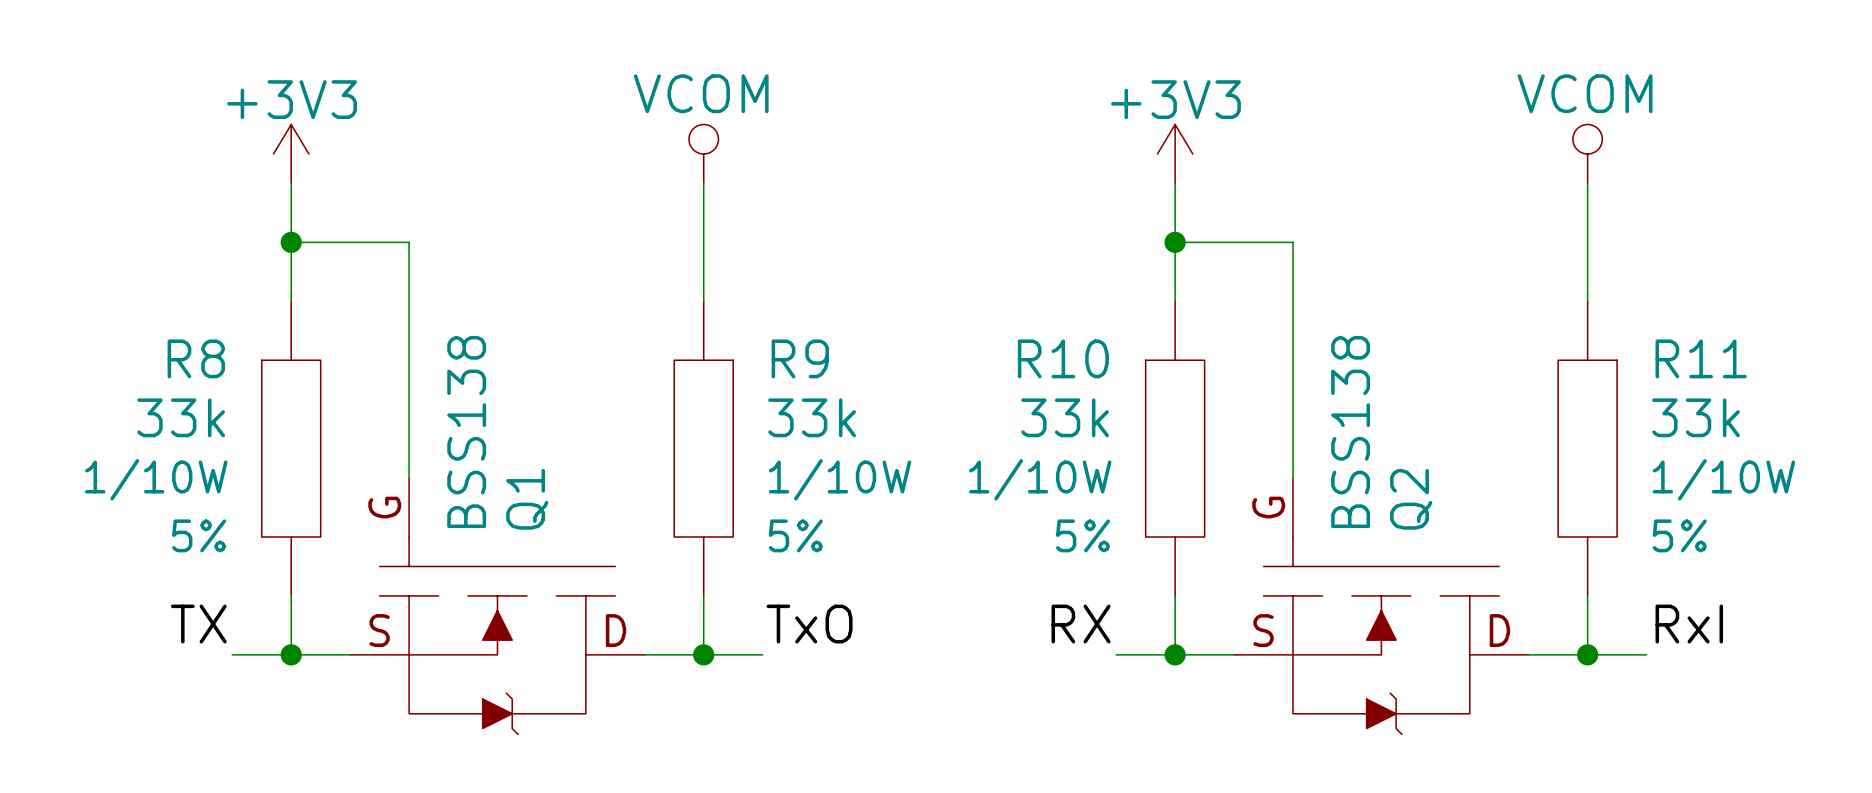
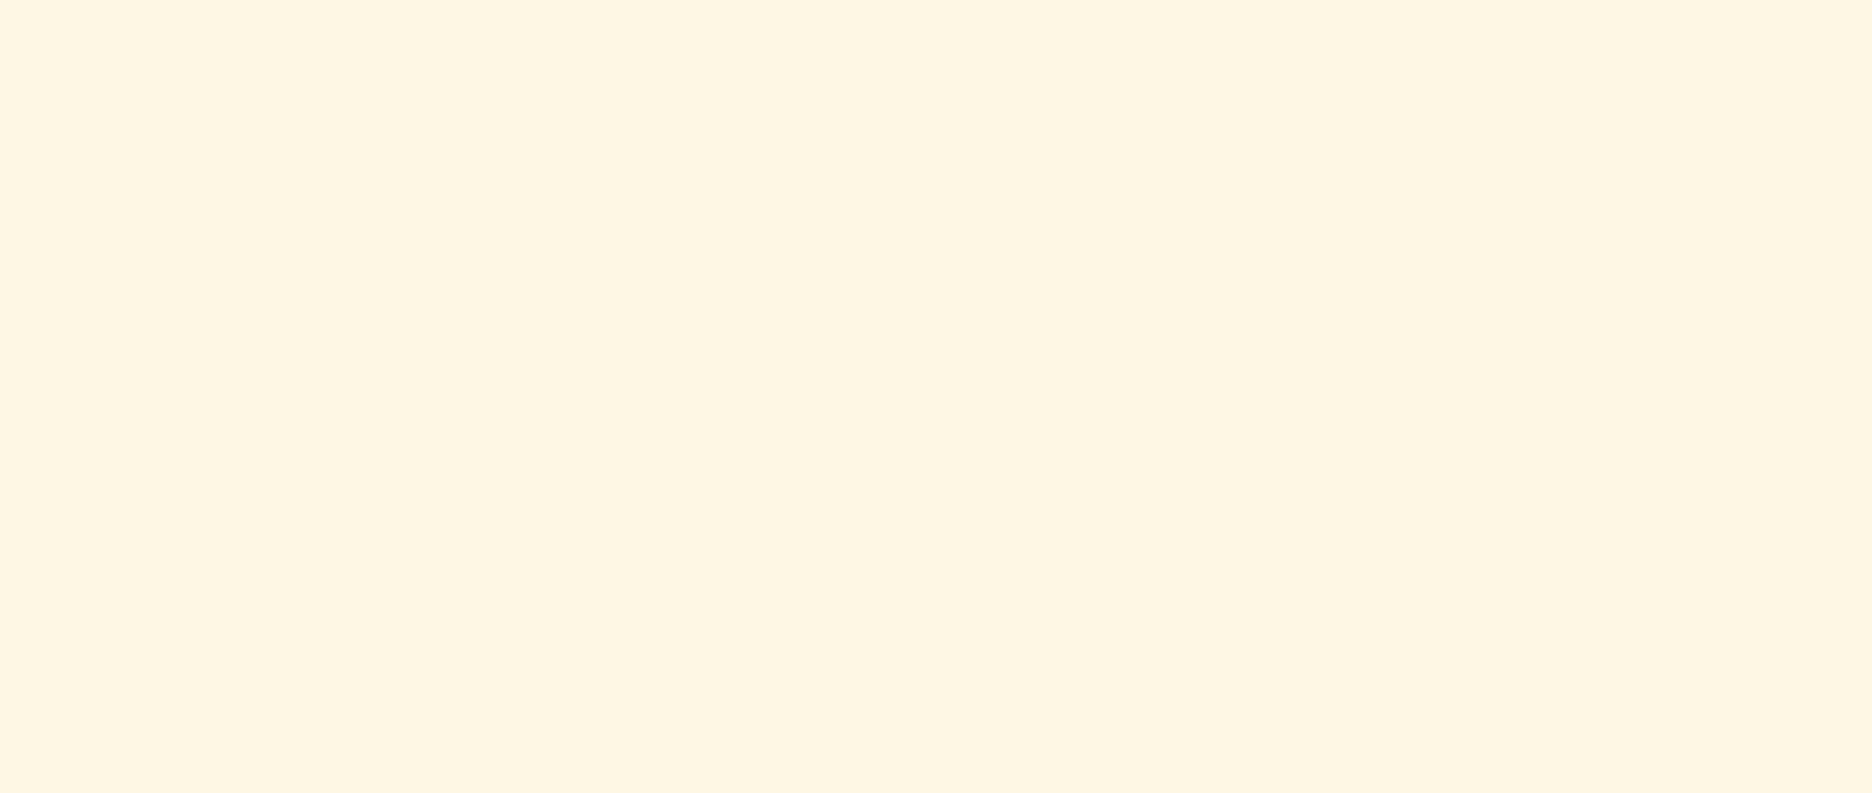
power symbol: +3V3 (291, 153) -> none
power symbol: VCOM (703, 153) -> none
power symbol: +3V3 (1175, 153) -> none
power symbol: VCOM (1587, 153) -> none
wire: (291, 183) (291, 301) -> none
wire: (703, 183) (703, 301) -> none
wire: (1175, 183) (1175, 301) -> none
wire: (1587, 183) (1587, 301) -> none
wire: (291, 242) (409, 242) (409, 478) -> none
junction: (291, 242) -> none
wire: (1175, 242) (1292, 242) (1292, 478) -> none
junction: (1175, 242) -> none
R8: 33k (291, 448) -> none
R9: 33k (703, 448) -> none
R10: 33k (1175, 448) -> none
R11: 33k (1587, 448) -> none
wire: (291, 595) (291, 654) -> none
wire: (703, 595) (703, 654) -> none
wire: (1175, 595) (1175, 654) -> none
wire: (1587, 595) (1587, 654) -> none
Q1: BSS138 (497, 606) -> none
Q2: BSS138 (1381, 606) -> none
label: TX (198, 624) -> none
label: TxO (809, 624) -> none
label: RX (1081, 624) -> none
label: RxI (1689, 624) -> none
wire: (232, 654) (350, 654) -> none
junction: (291, 654) -> none
wire: (644, 654) (762, 654) -> none
junction: (703, 654) -> none
wire: (1116, 654) (1234, 654) -> none
junction: (1175, 654) -> none
wire: (1528, 654) (1646, 654) -> none
junction: (1587, 654) -> none

